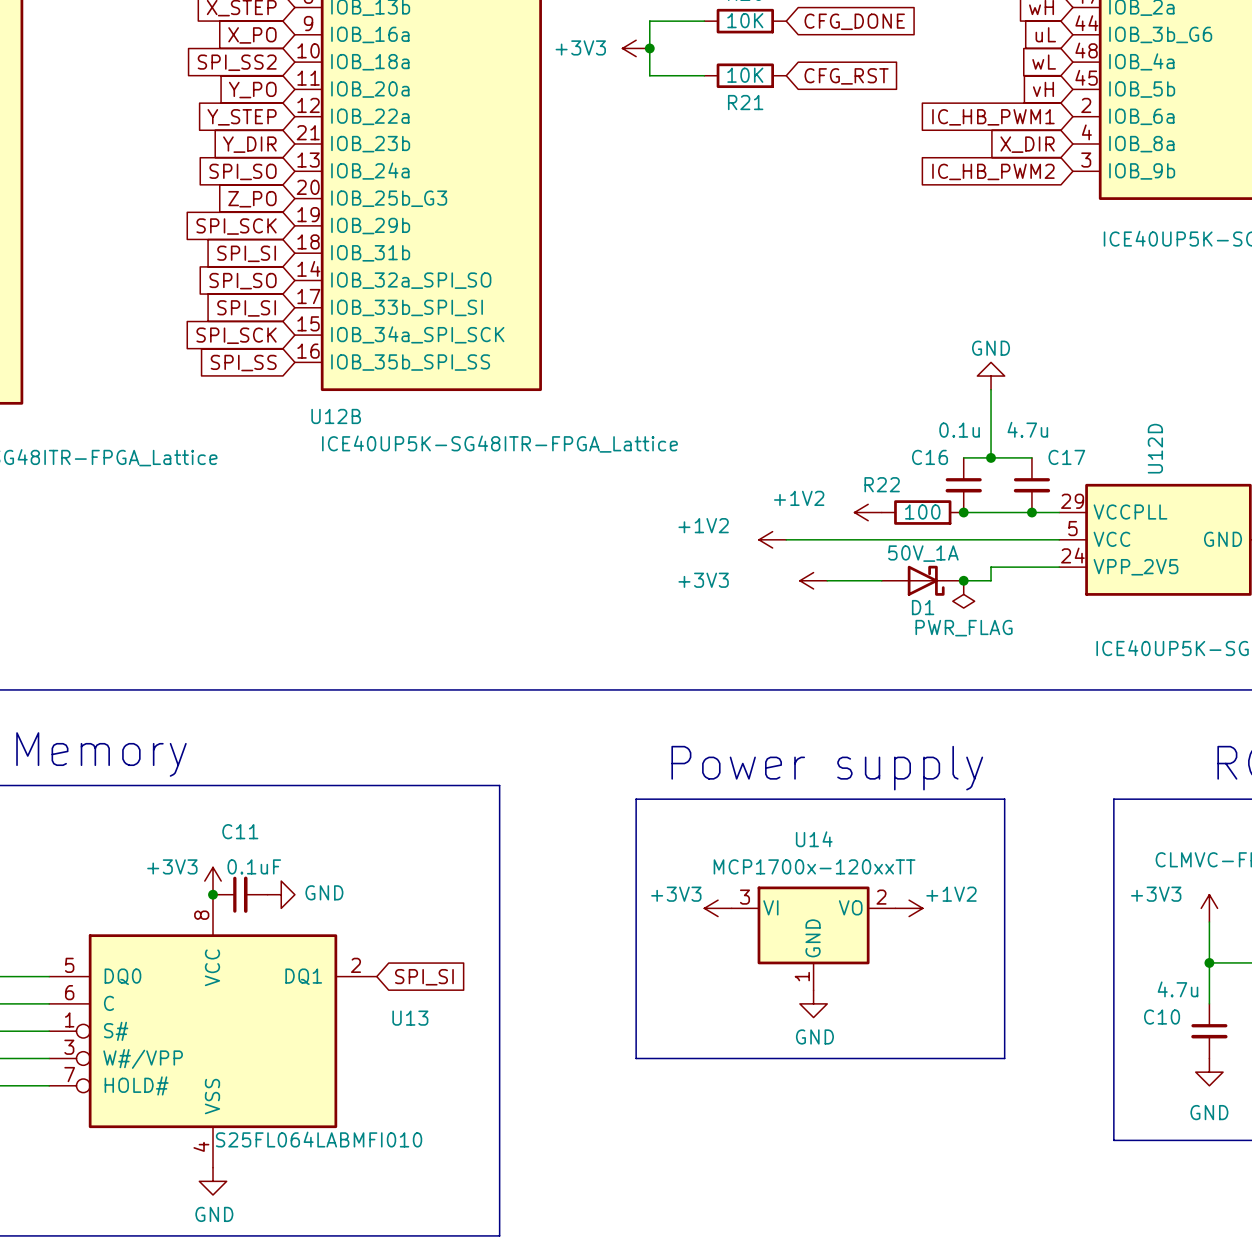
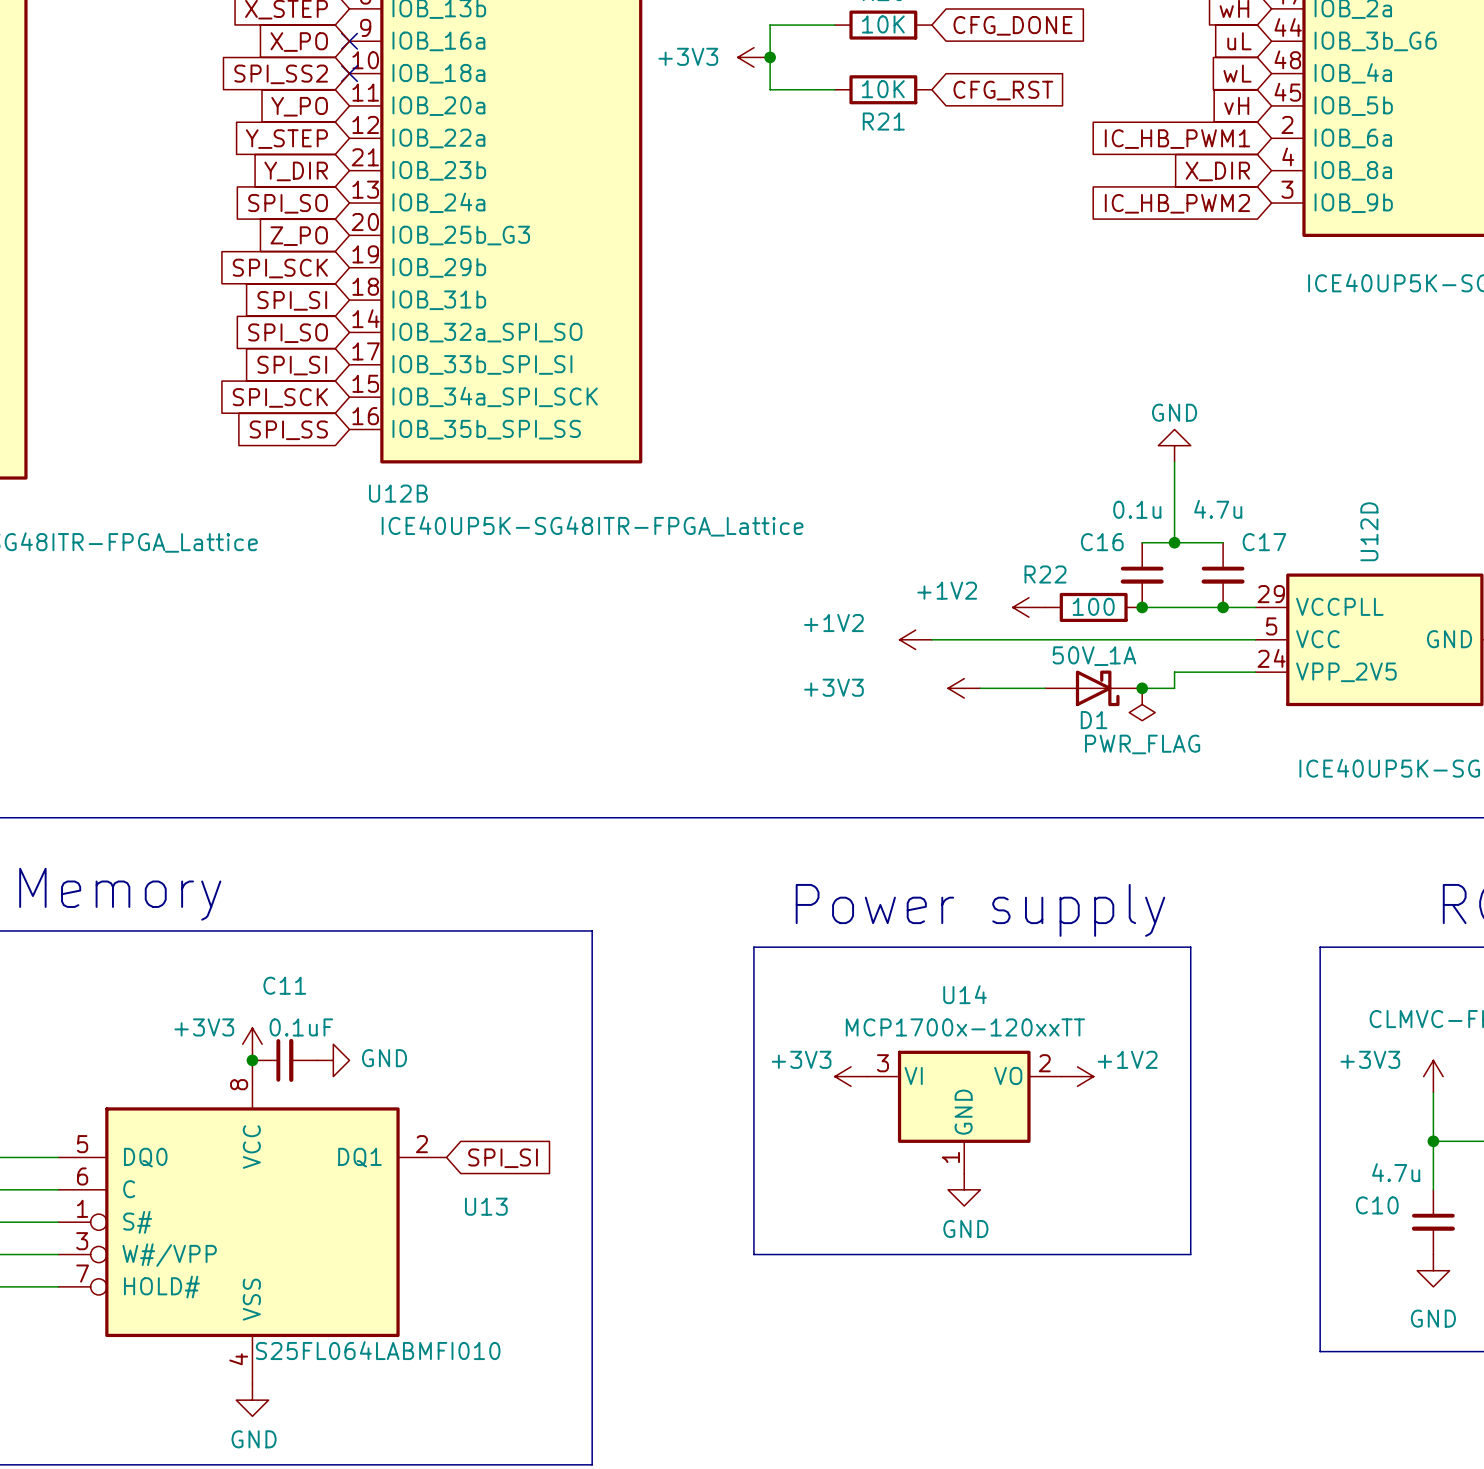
no-connect mark: none -> (349, 41)
no-connect mark: none -> (349, 73)

